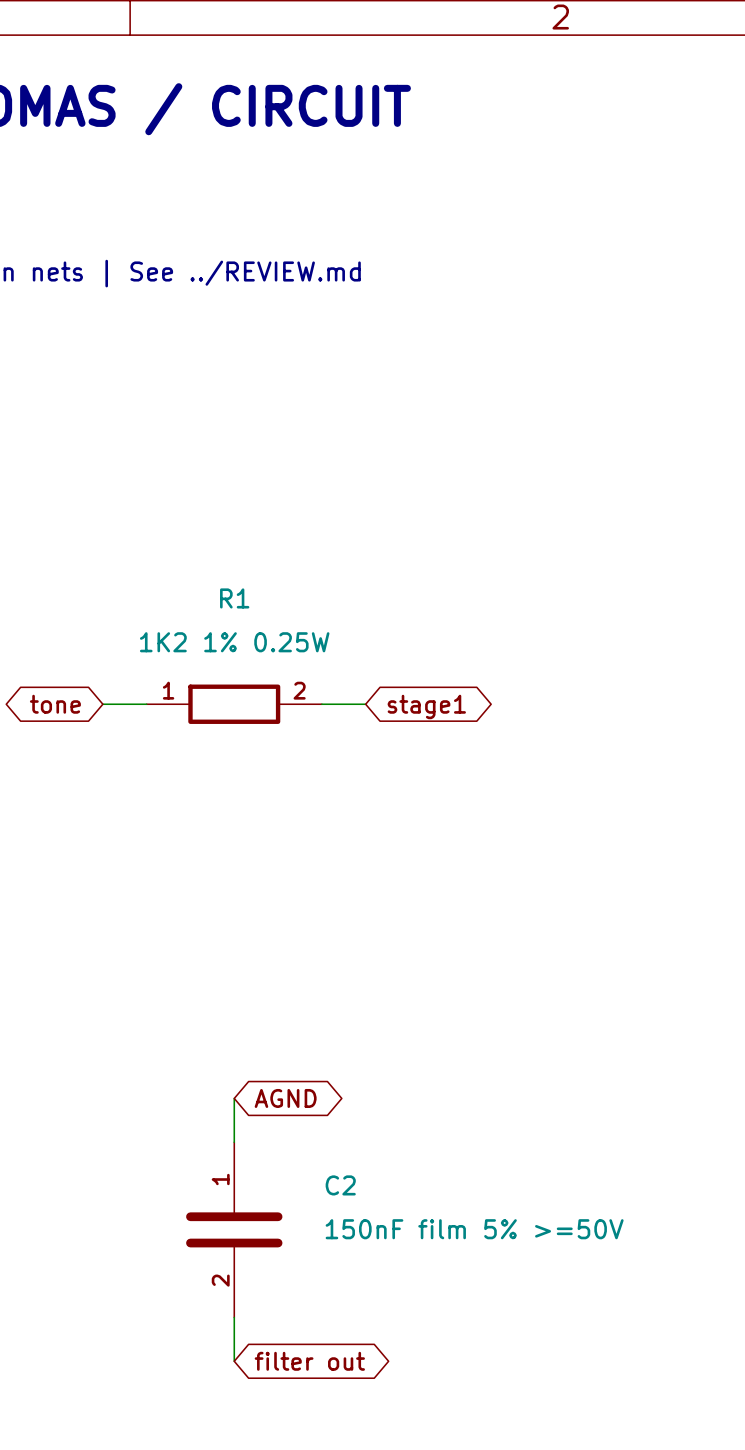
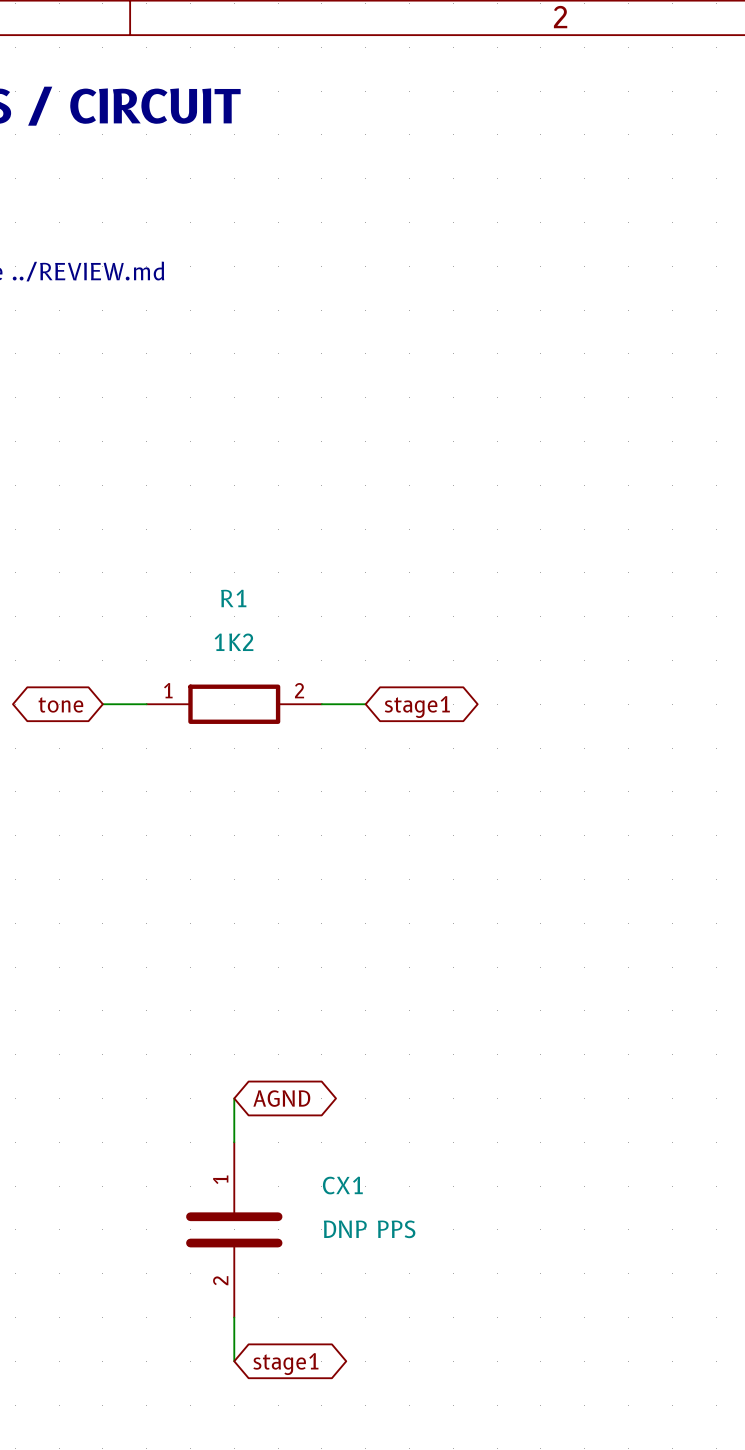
R1 value: 1K2 1% 0.25W (234, 642) -> 1K2 (234, 642)
C2 name: C2 (340, 1185) -> CX1 (342, 1185)
C2 value: 150nF film 5% >=50V (474, 1229) -> DNP PPS (369, 1229)
global label: filter out (309, 1361) -> stage1 (285, 1364)

